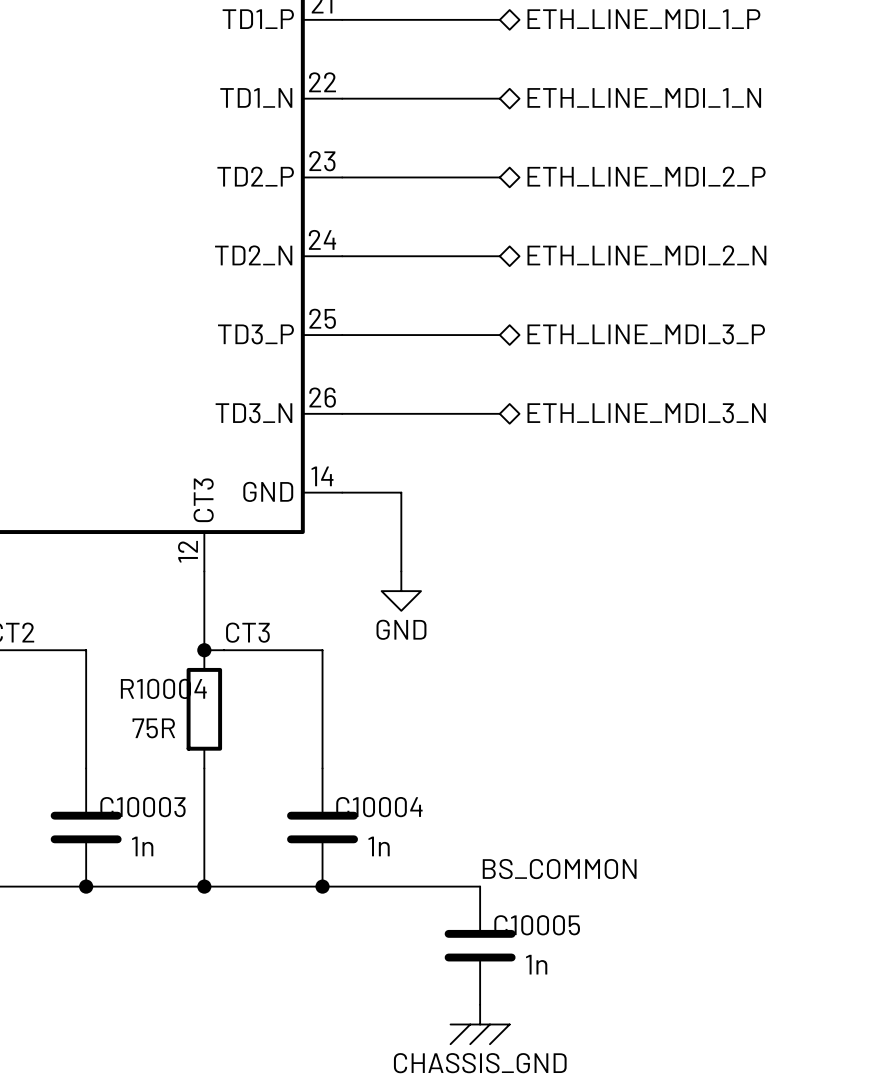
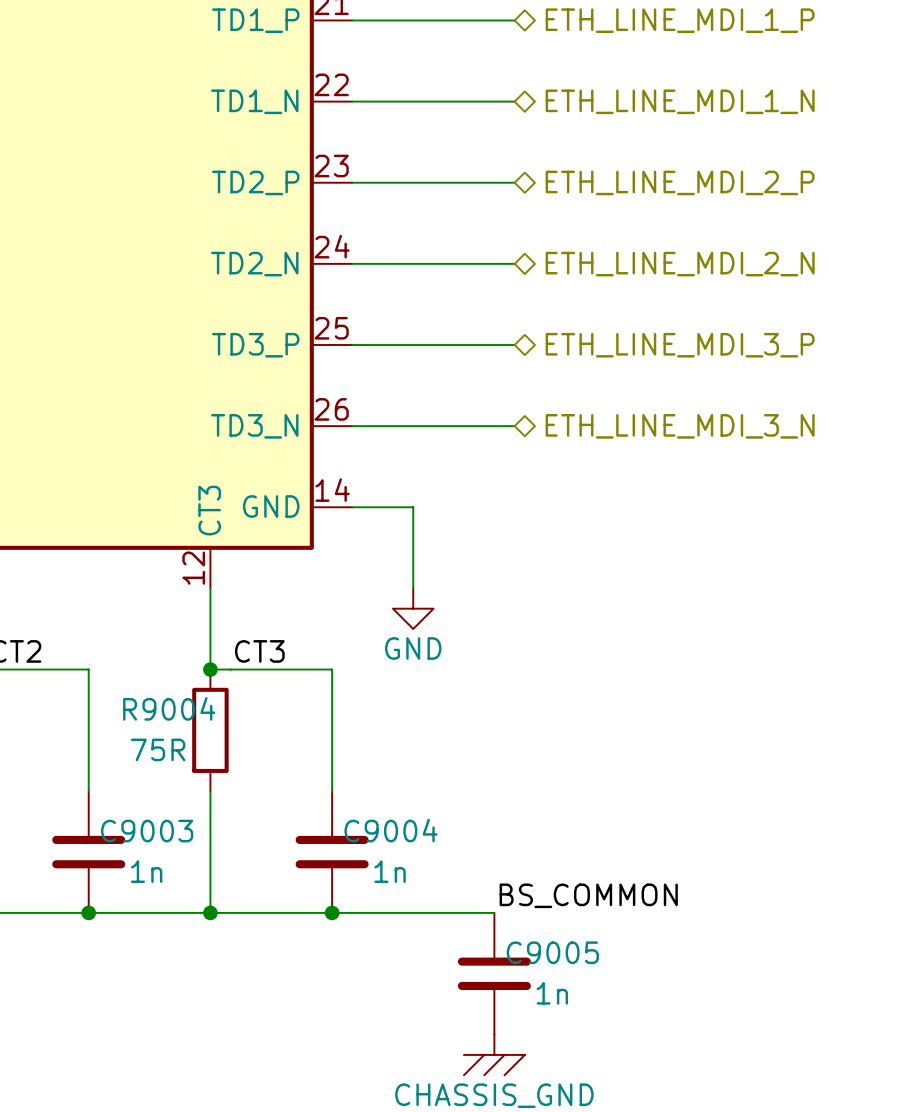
R10004 name: R10004 (163, 688) -> R9004 (169, 708)
C10003 name: C10003 (142, 807) -> C9003 (147, 831)
C10004 name: C10004 (379, 807) -> C9004 (391, 830)
C10005 name: C10005 (537, 925) -> C9005 (552, 952)

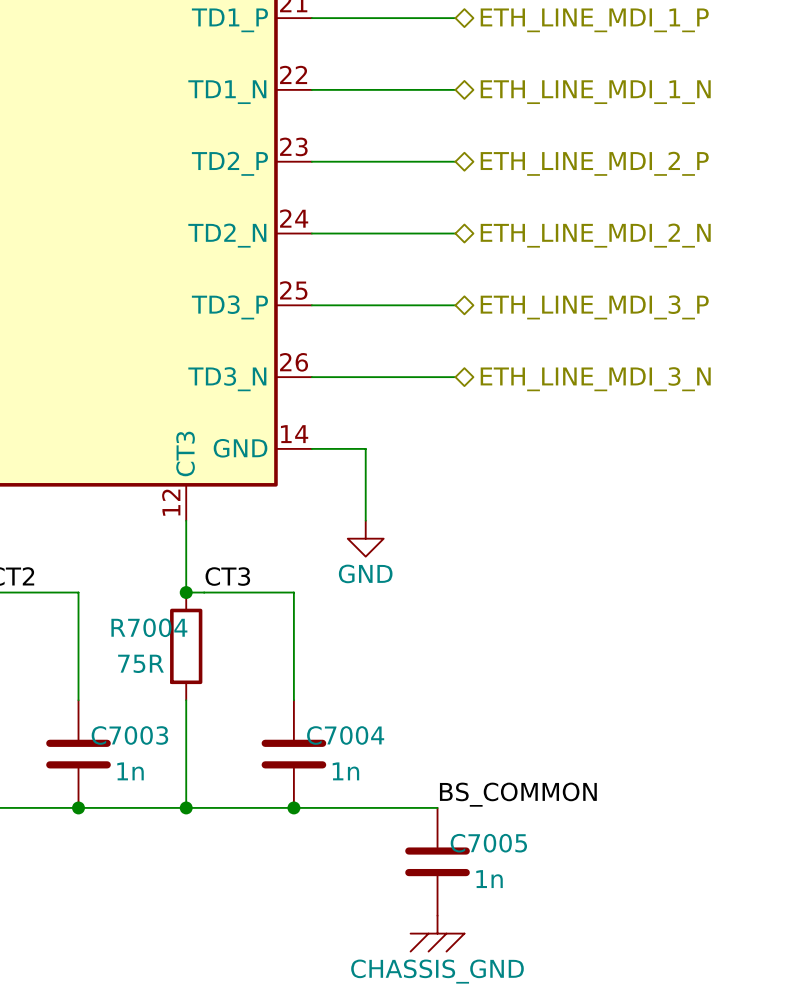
R9004 name: R9004 (169, 708) -> R7004 (149, 627)
C9004 name: C9004 (391, 830) -> C7004 (345, 735)
C9003 name: C9003 (147, 831) -> C7003 (129, 735)
C9005 name: C9005 (552, 952) -> C7005 (488, 843)

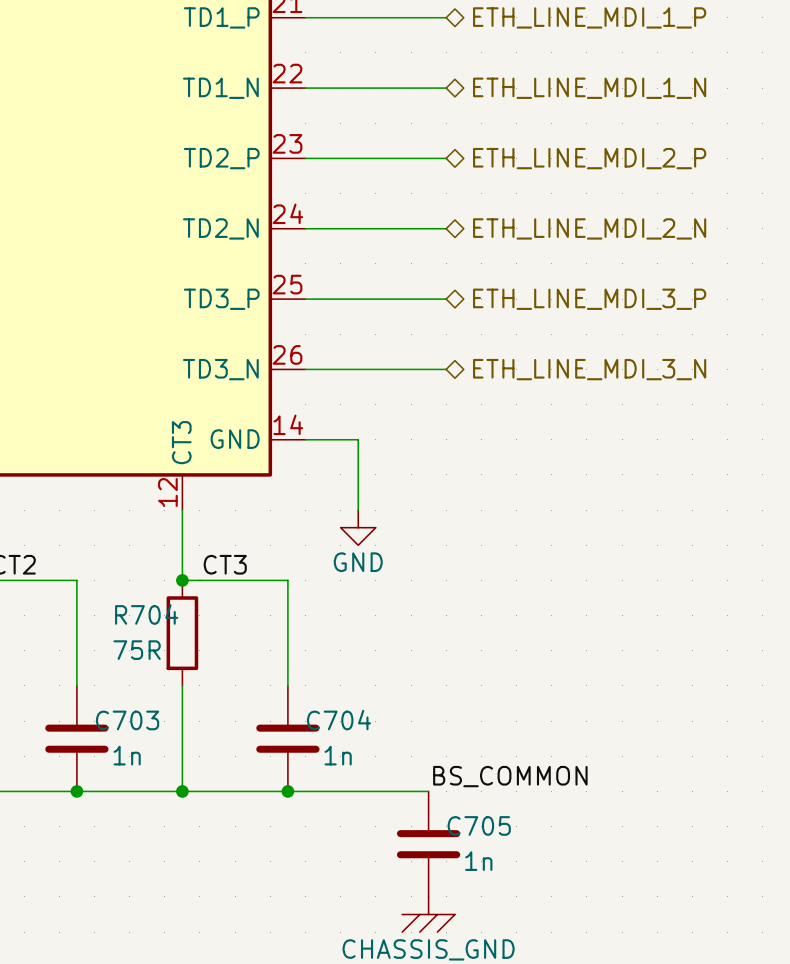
R7004 name: R7004 (149, 627) -> R704 (146, 614)
C7003 name: C7003 (129, 735) -> C703 (127, 720)
C7004 name: C7004 (345, 735) -> C704 (338, 720)
C7005 name: C7005 (488, 843) -> C705 (479, 825)

